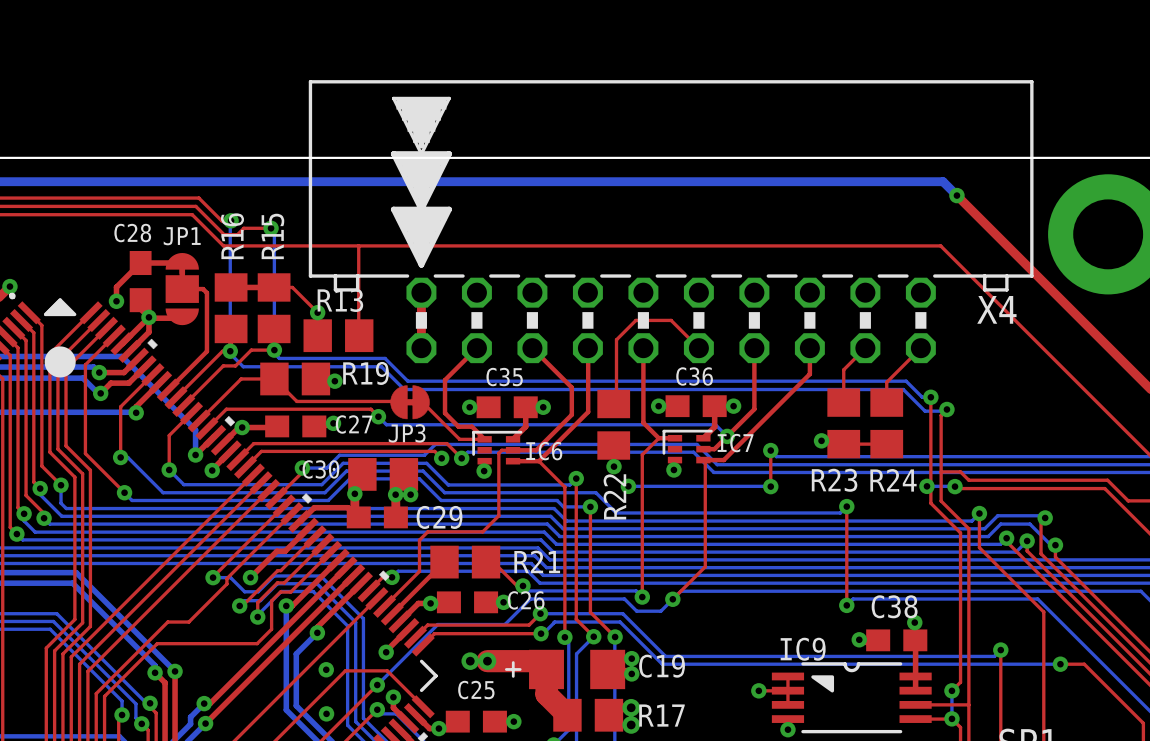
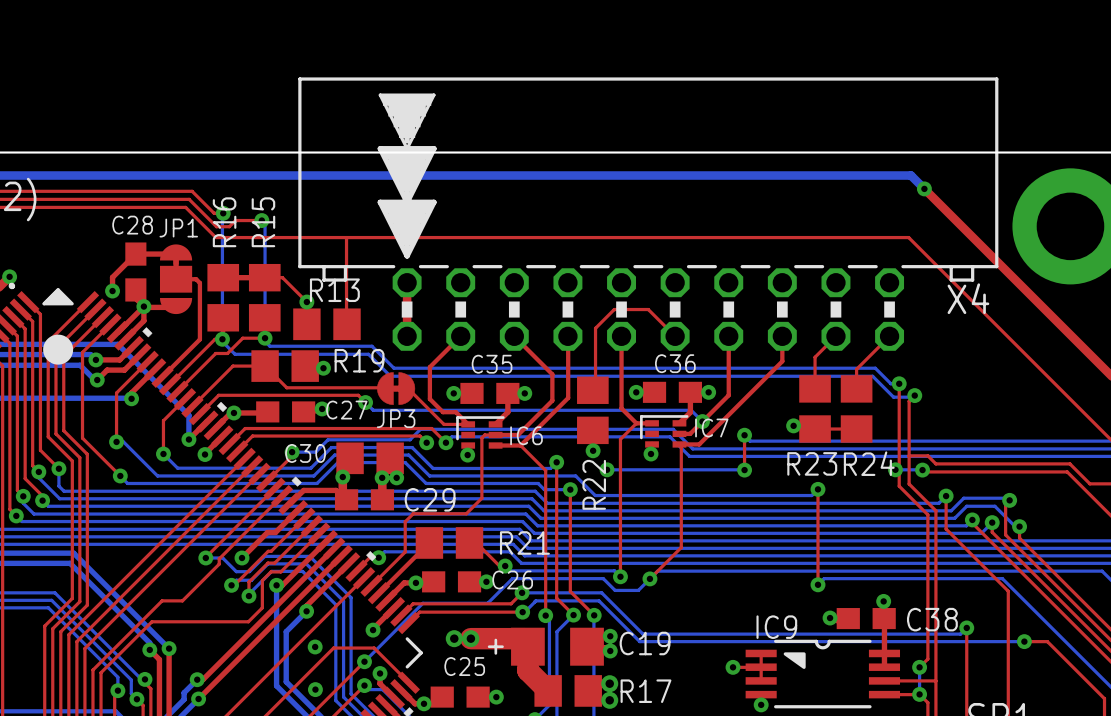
C38 name position: C38 (894, 606) -> C38 (932, 619)

